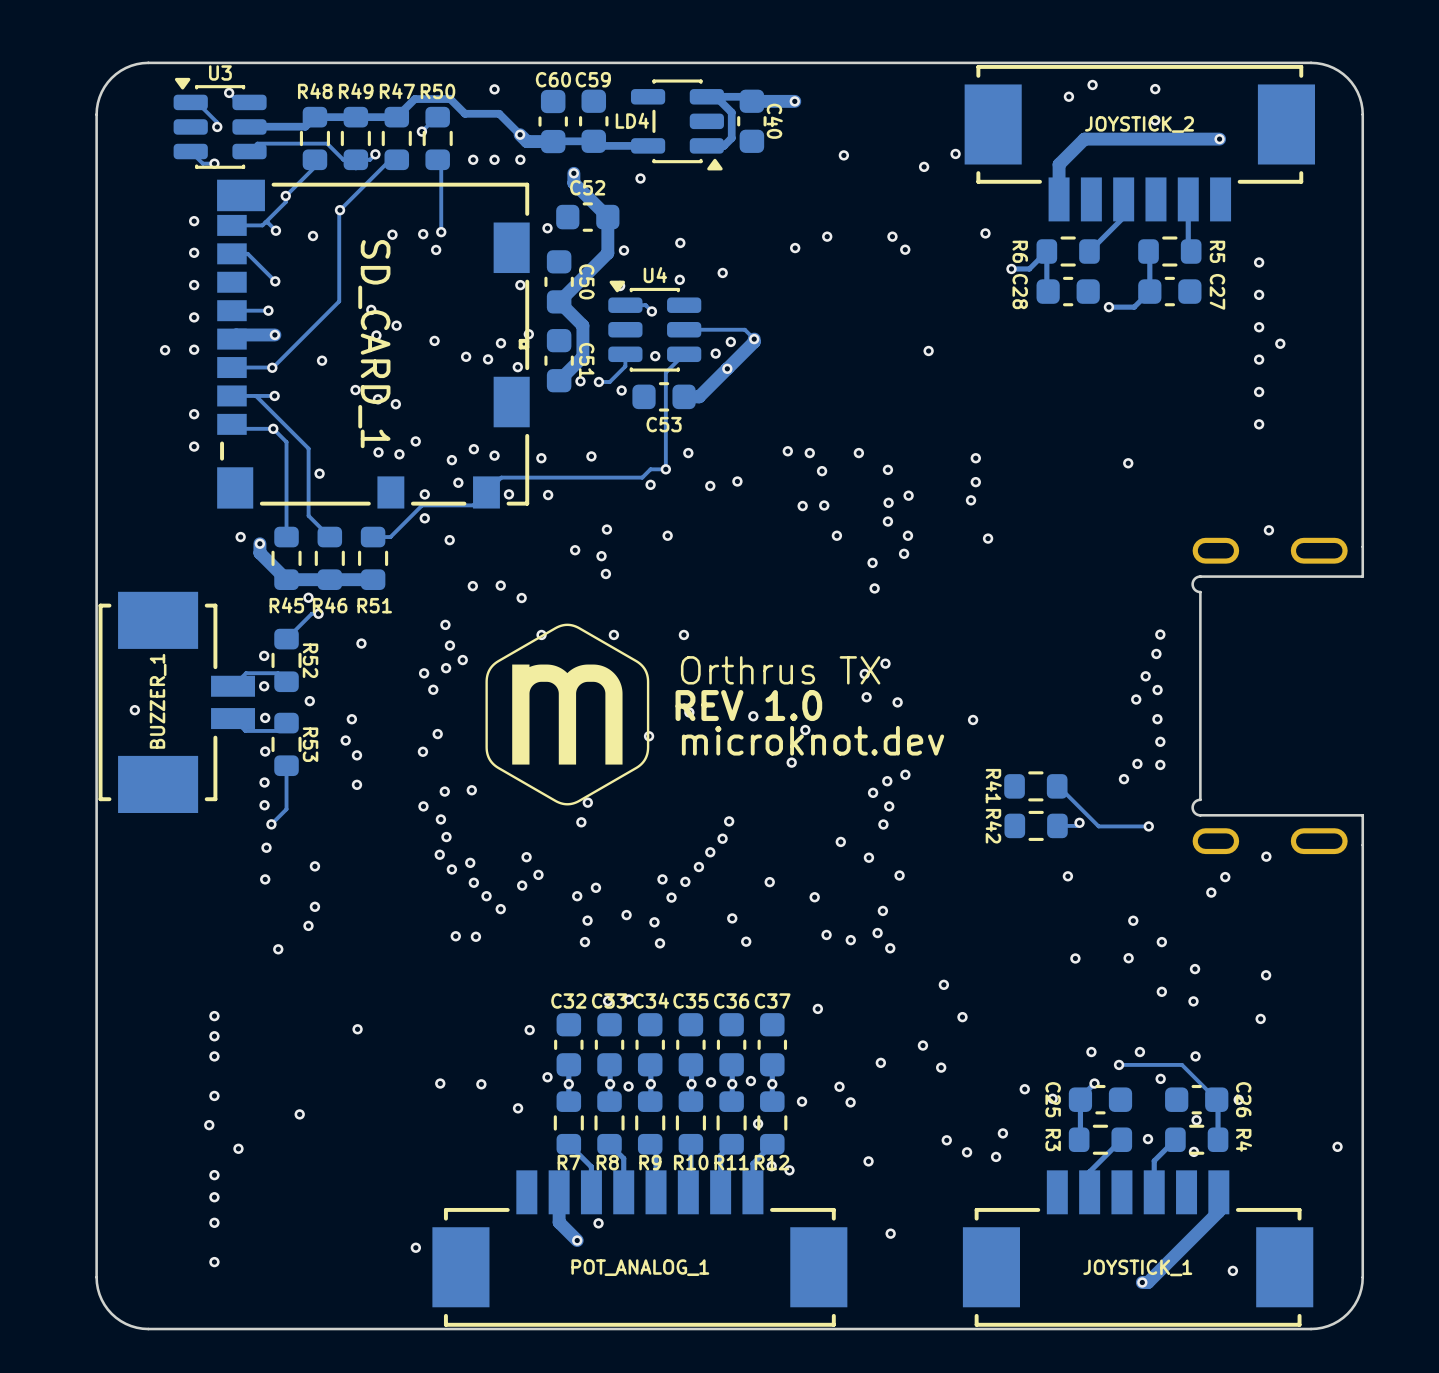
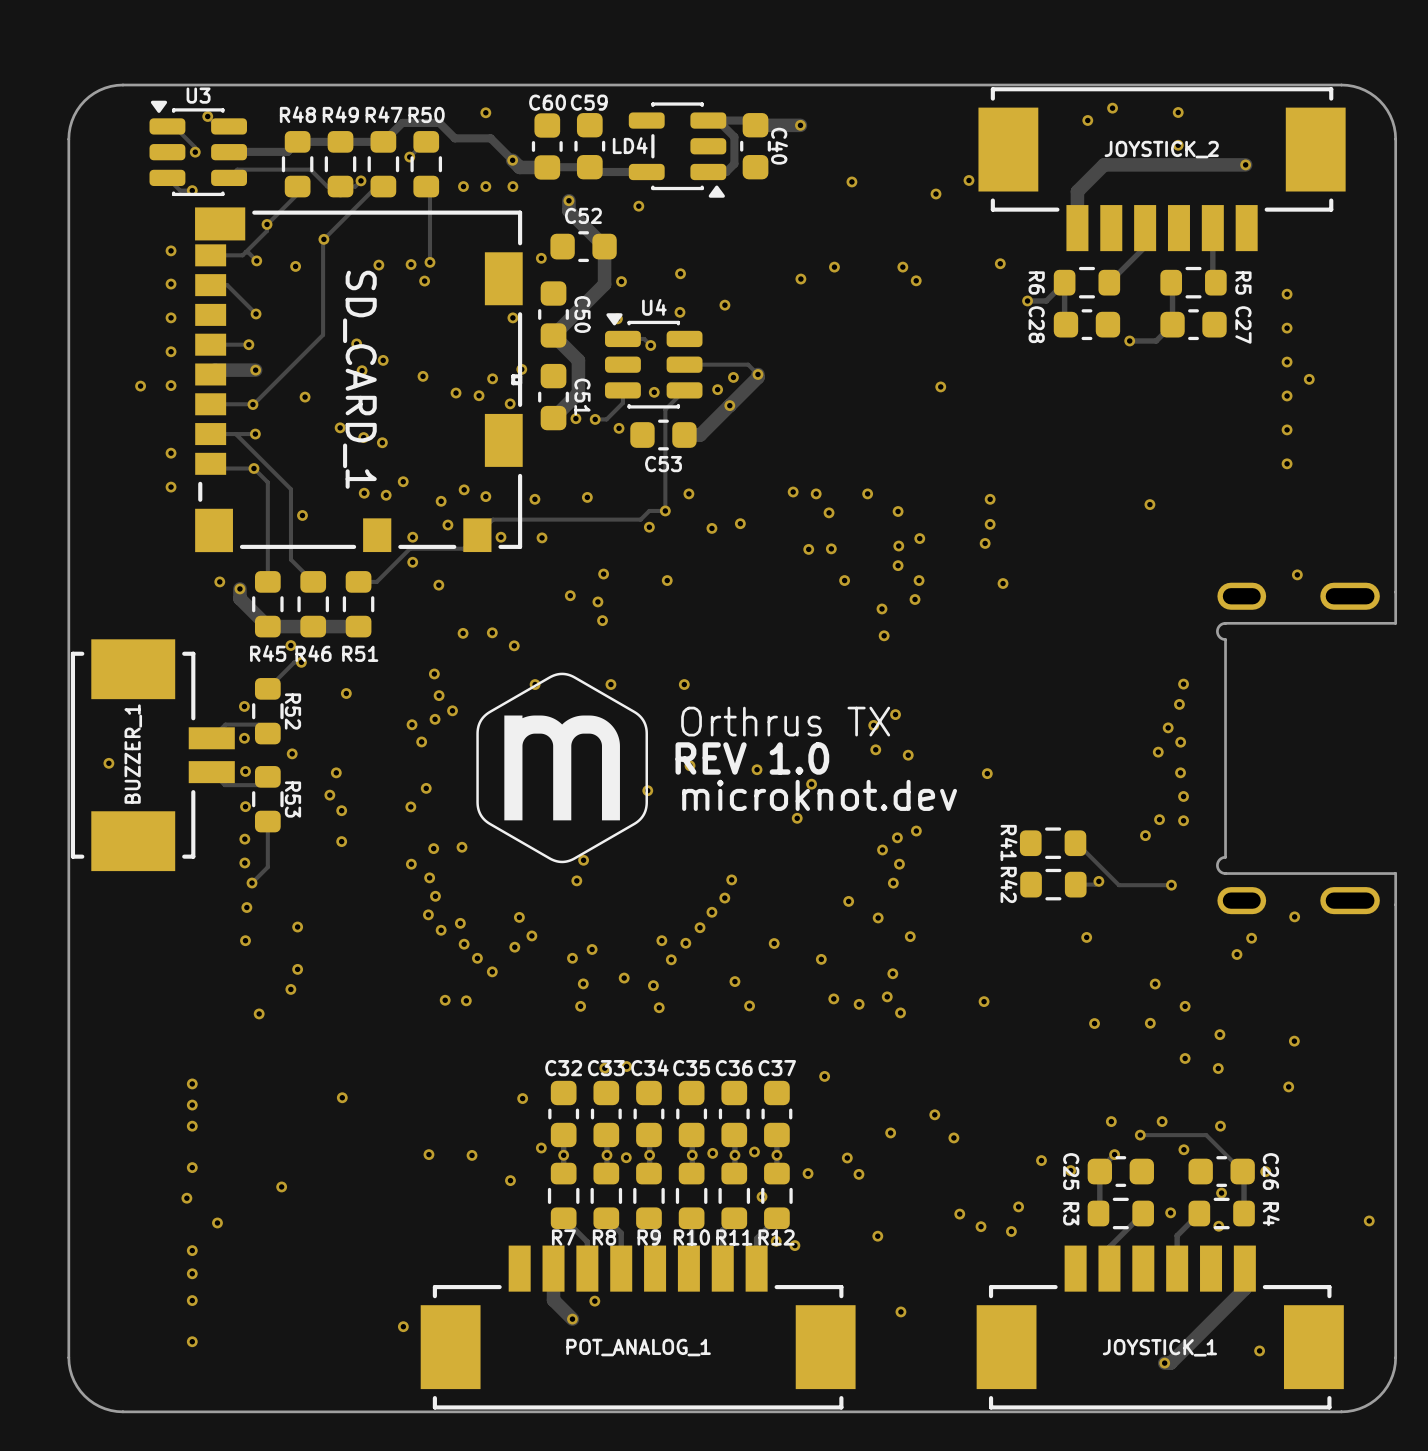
via: none -> (984, 1001)
via: (943, 984) -> none
via: (962, 1017) -> none

